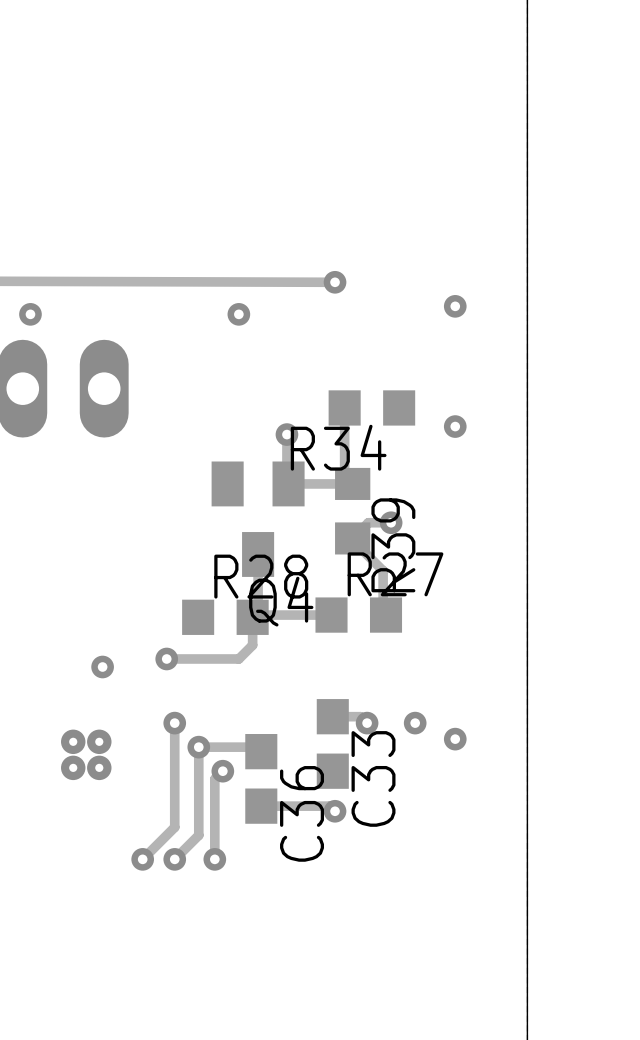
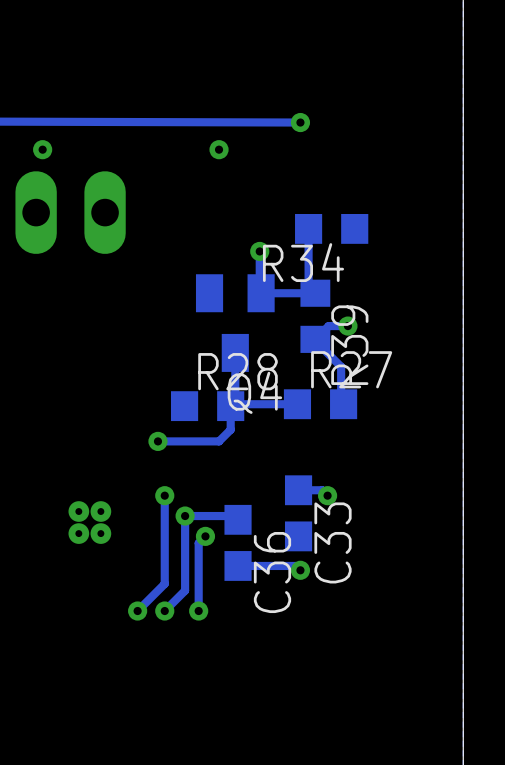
via: (455, 306) -> none
via: (455, 426) -> none
via: (102, 667) -> none
via: (415, 723) -> none
via: (455, 739) -> none

